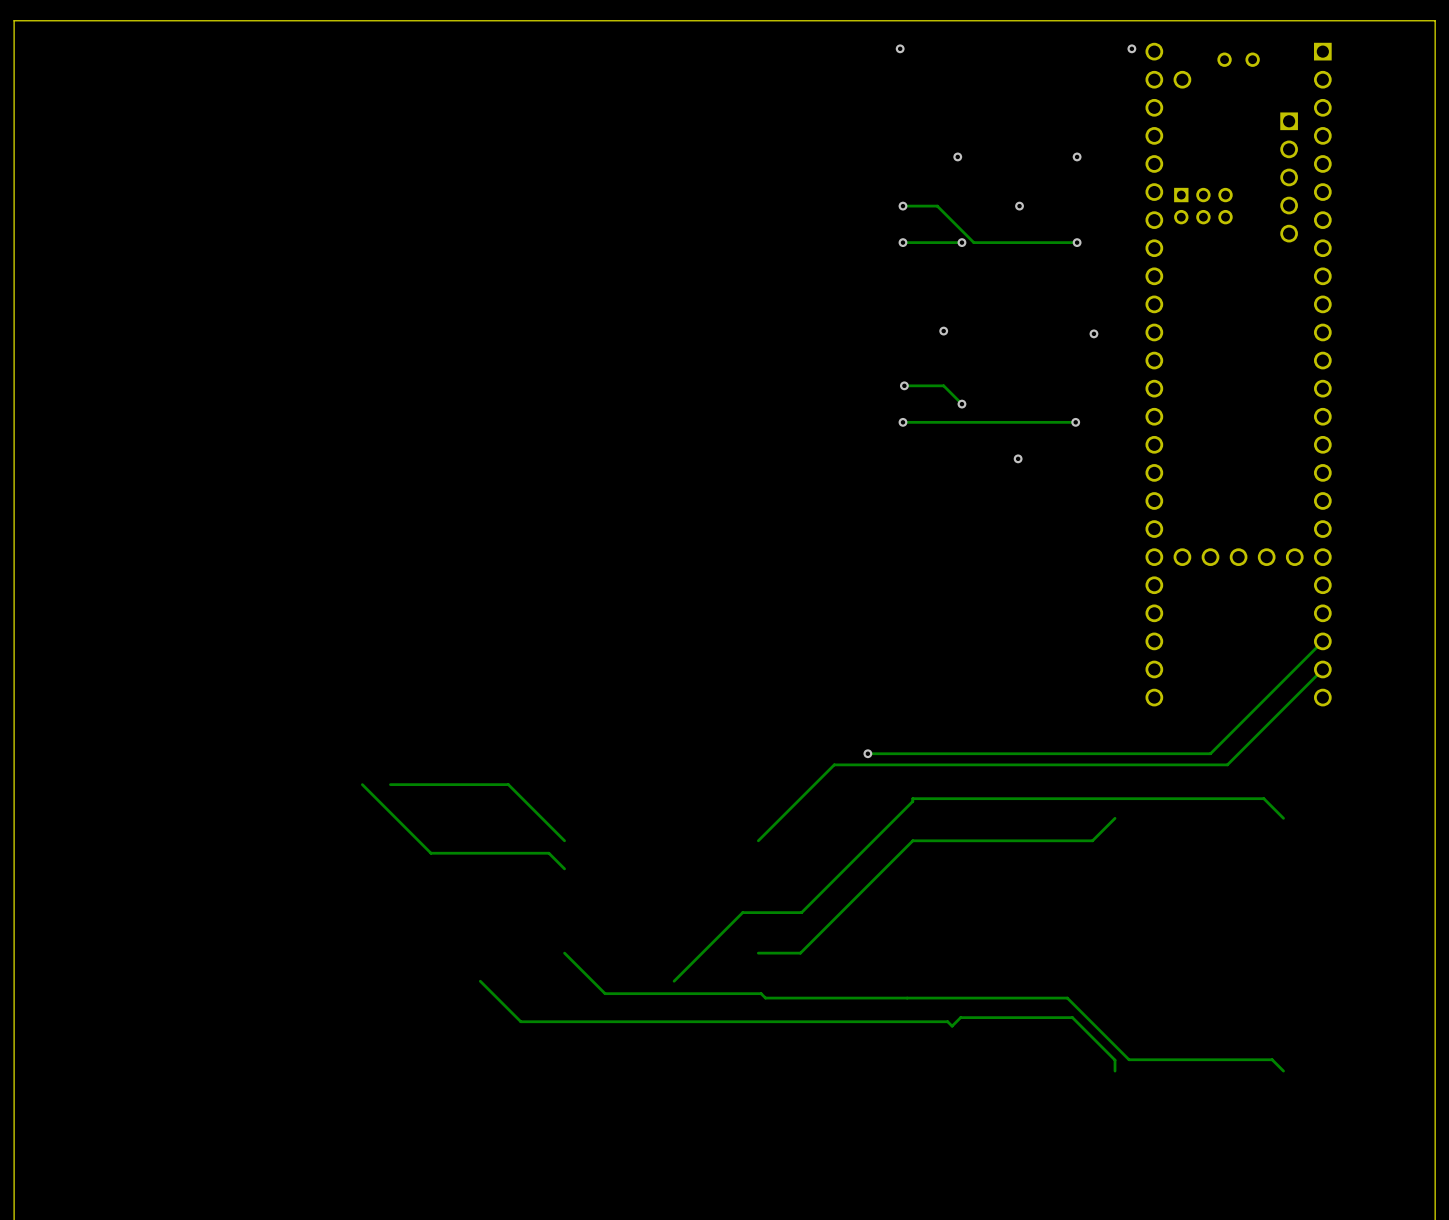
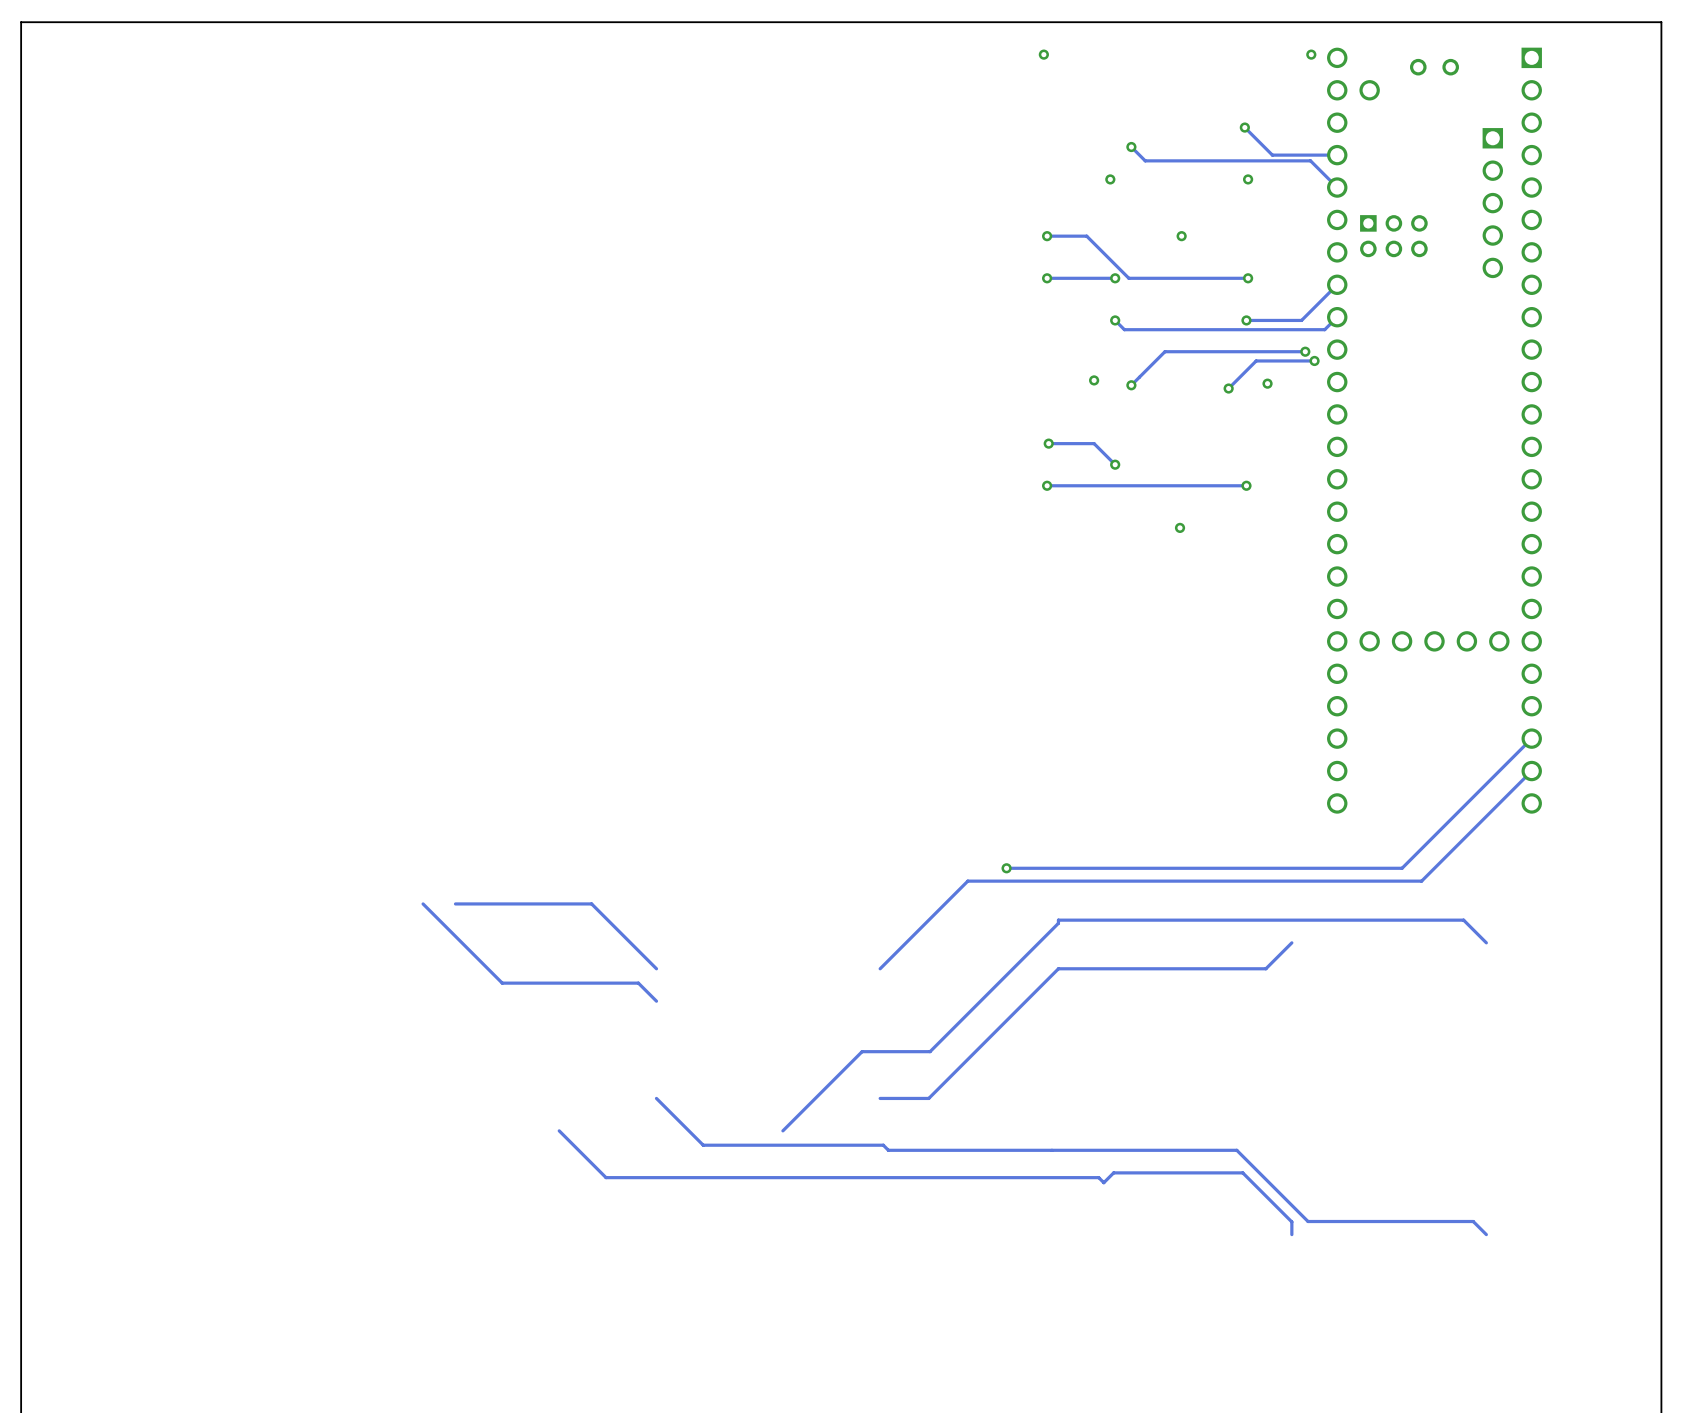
track: none -> (1244, 127) (1272, 155) (1337, 155)
via: none -> (1244, 127)
track: none -> (1131, 147) (1145, 160) (1310, 160) (1337, 187)
via: none -> (1131, 147)
track: none -> (1337, 284) (1301, 320) (1246, 320)
track: none -> (1337, 317) (1324, 329) (1124, 329) (1115, 320)
via: none -> (1115, 320)
via: none -> (1246, 320)
track: none -> (1305, 351) (1164, 351) (1131, 385)
via: none -> (1305, 351)
track: none -> (1314, 360) (1256, 360) (1228, 388) (1228, 386)
via: none -> (1314, 360)
via: none -> (1131, 385)
via: none -> (1228, 388)

